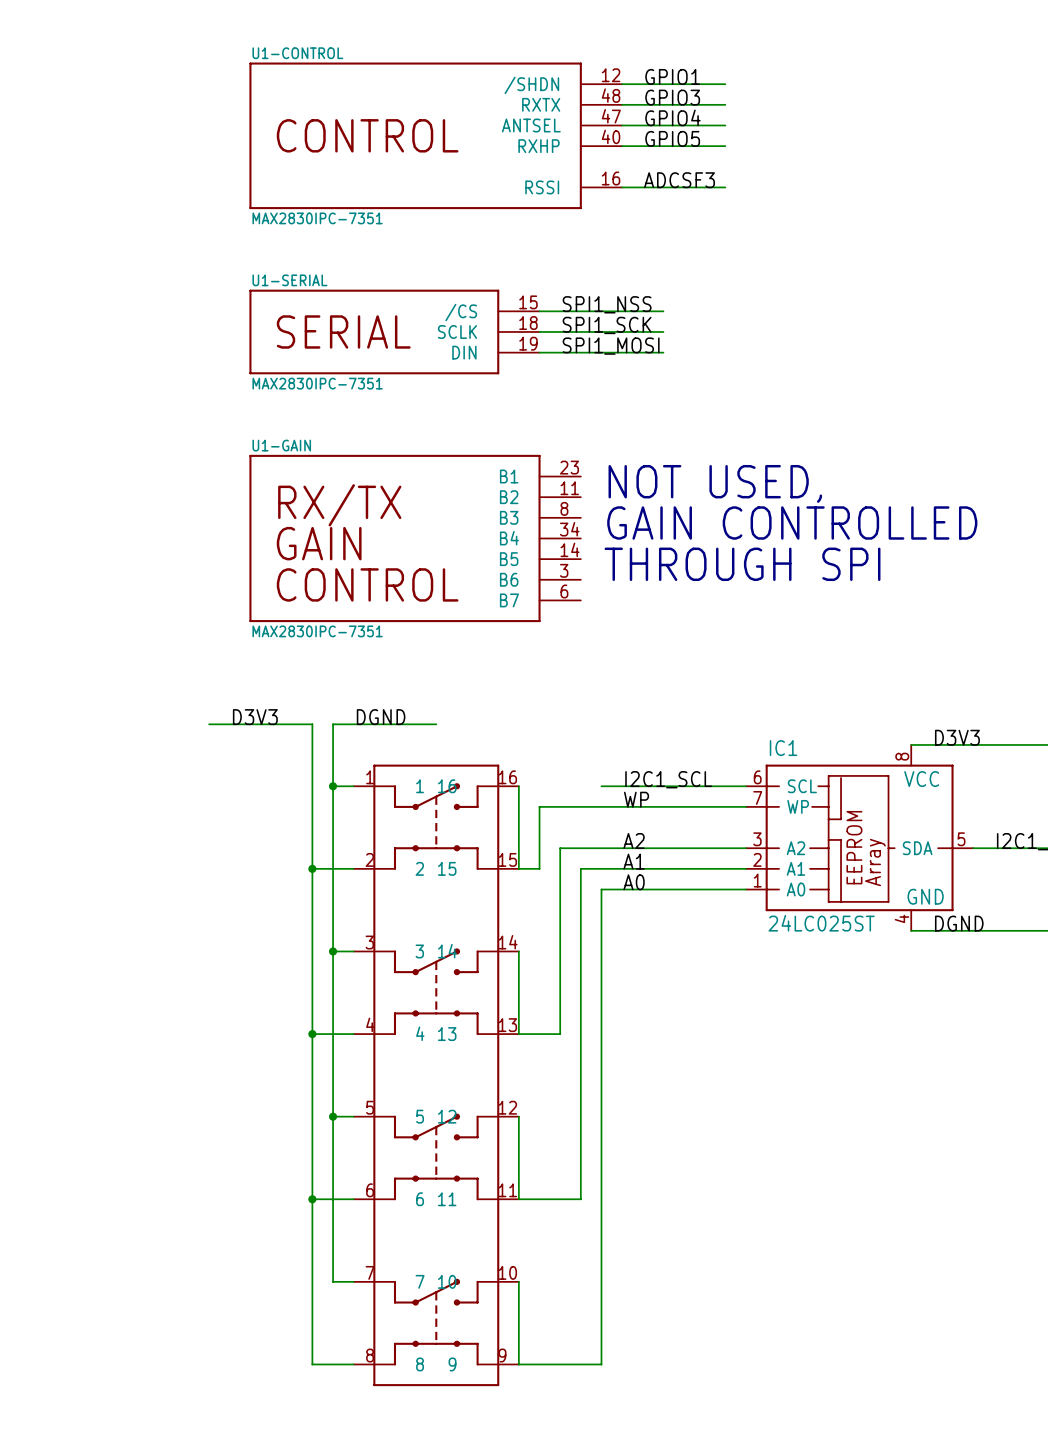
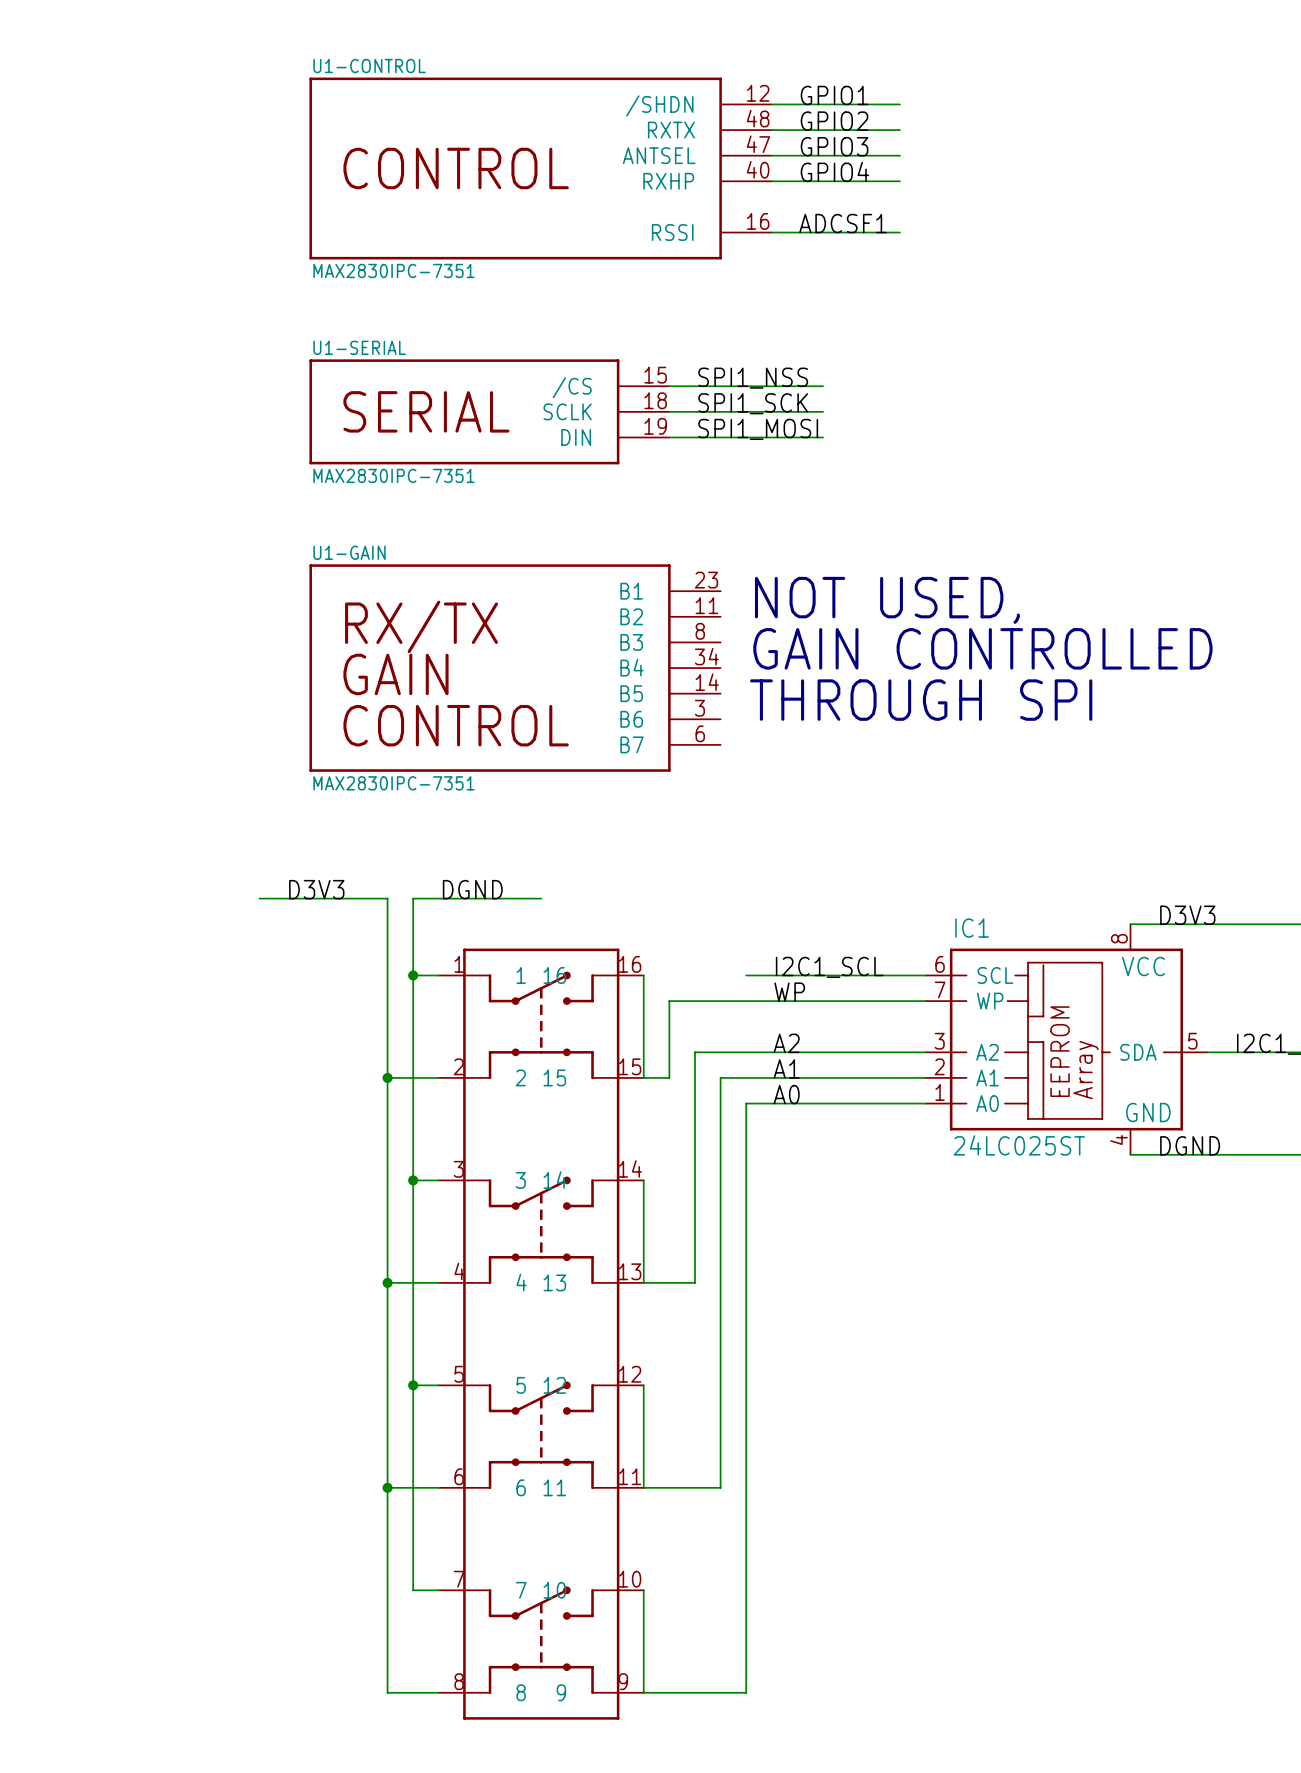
label: GPIO3 (672, 97) -> GPIO2 (834, 121)
label: GPIO4 (672, 117) -> GPIO3 (834, 146)
label: GPIO5 (672, 138) -> GPIO4 (834, 171)
label: ADCSF3 (679, 180) -> ADCSF1 (842, 223)

